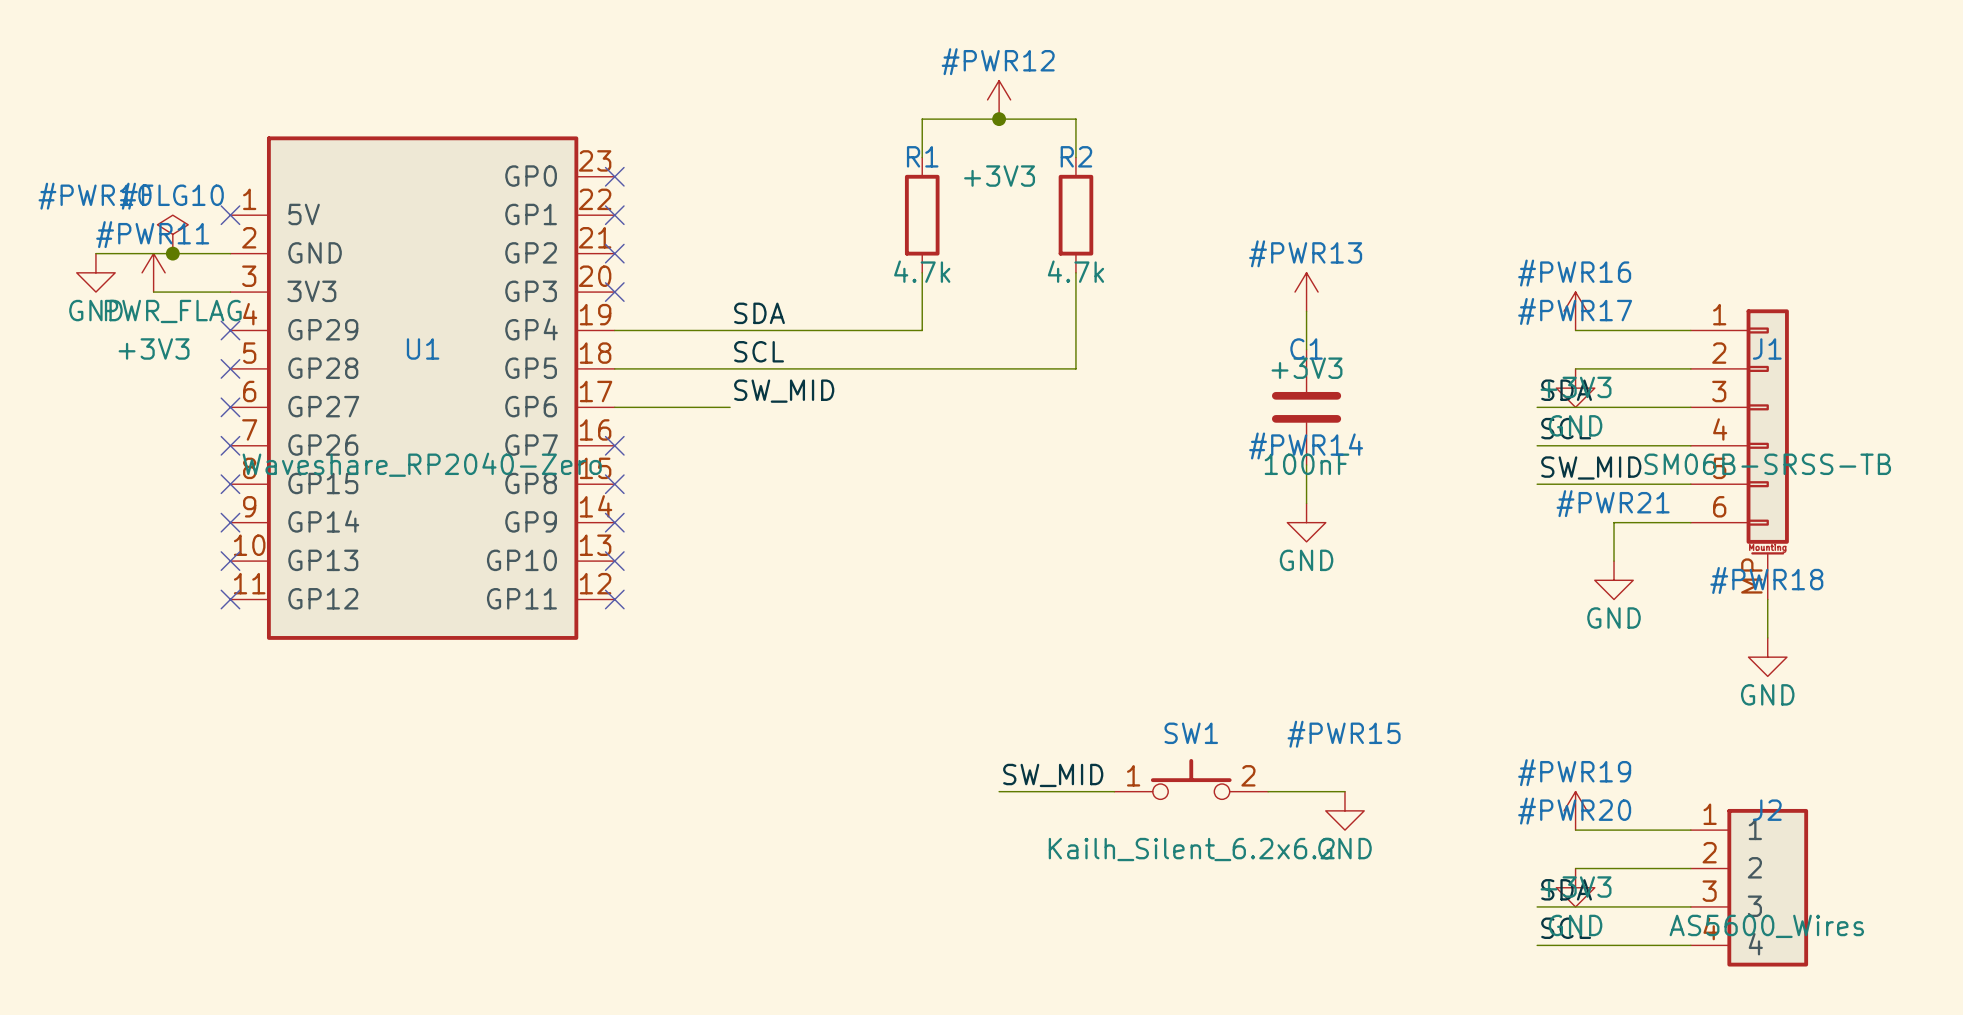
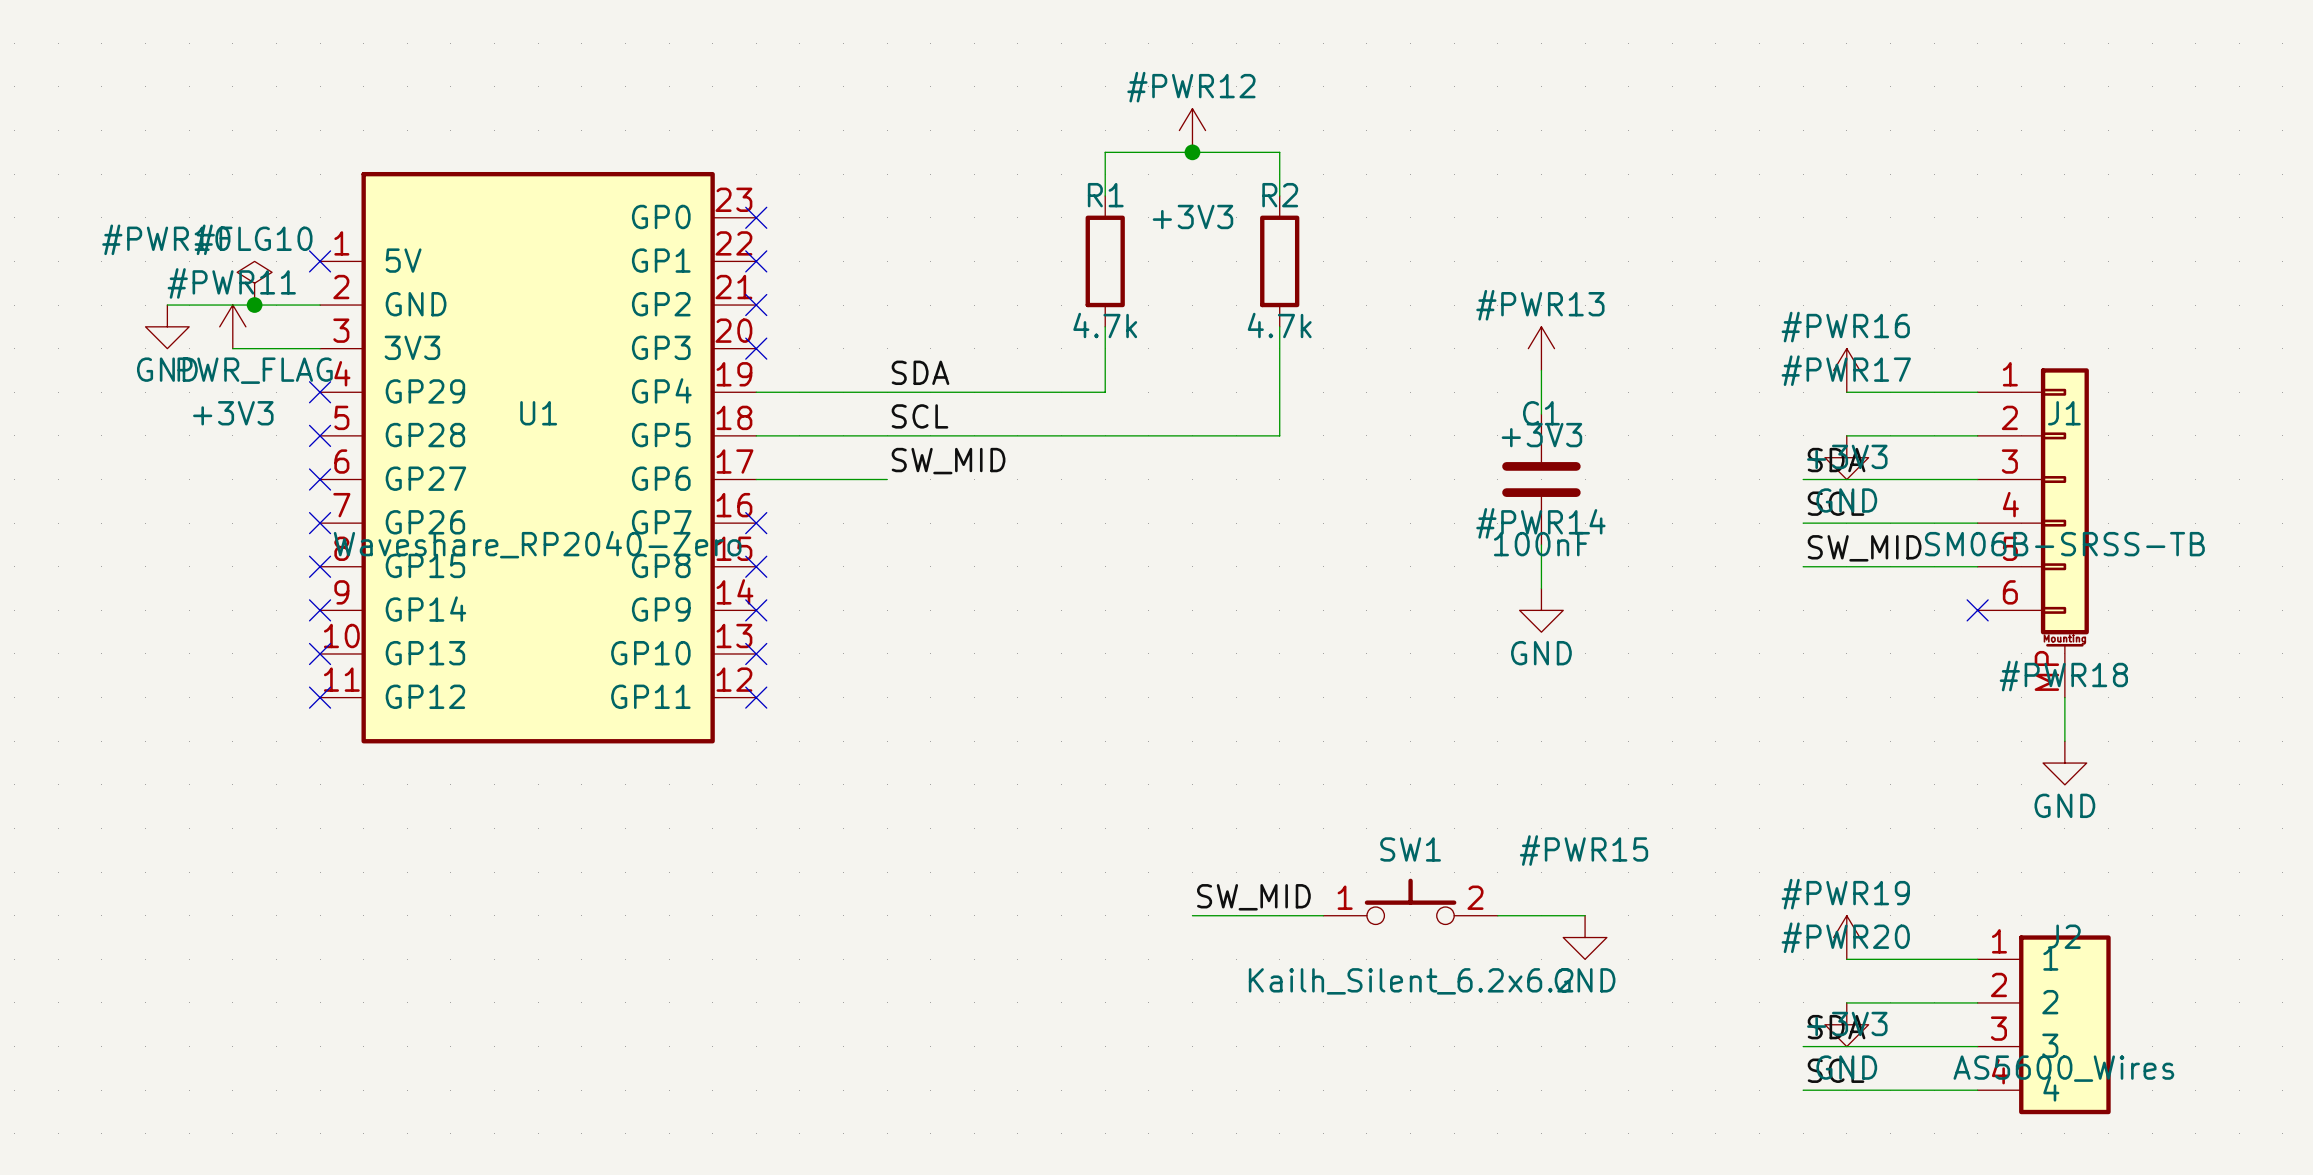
wire: (1690, 522) (1614, 522) (1614, 561) -> none
no-connect mark: none -> (1977, 610)
#PWR21: GND (1614, 580) -> none

